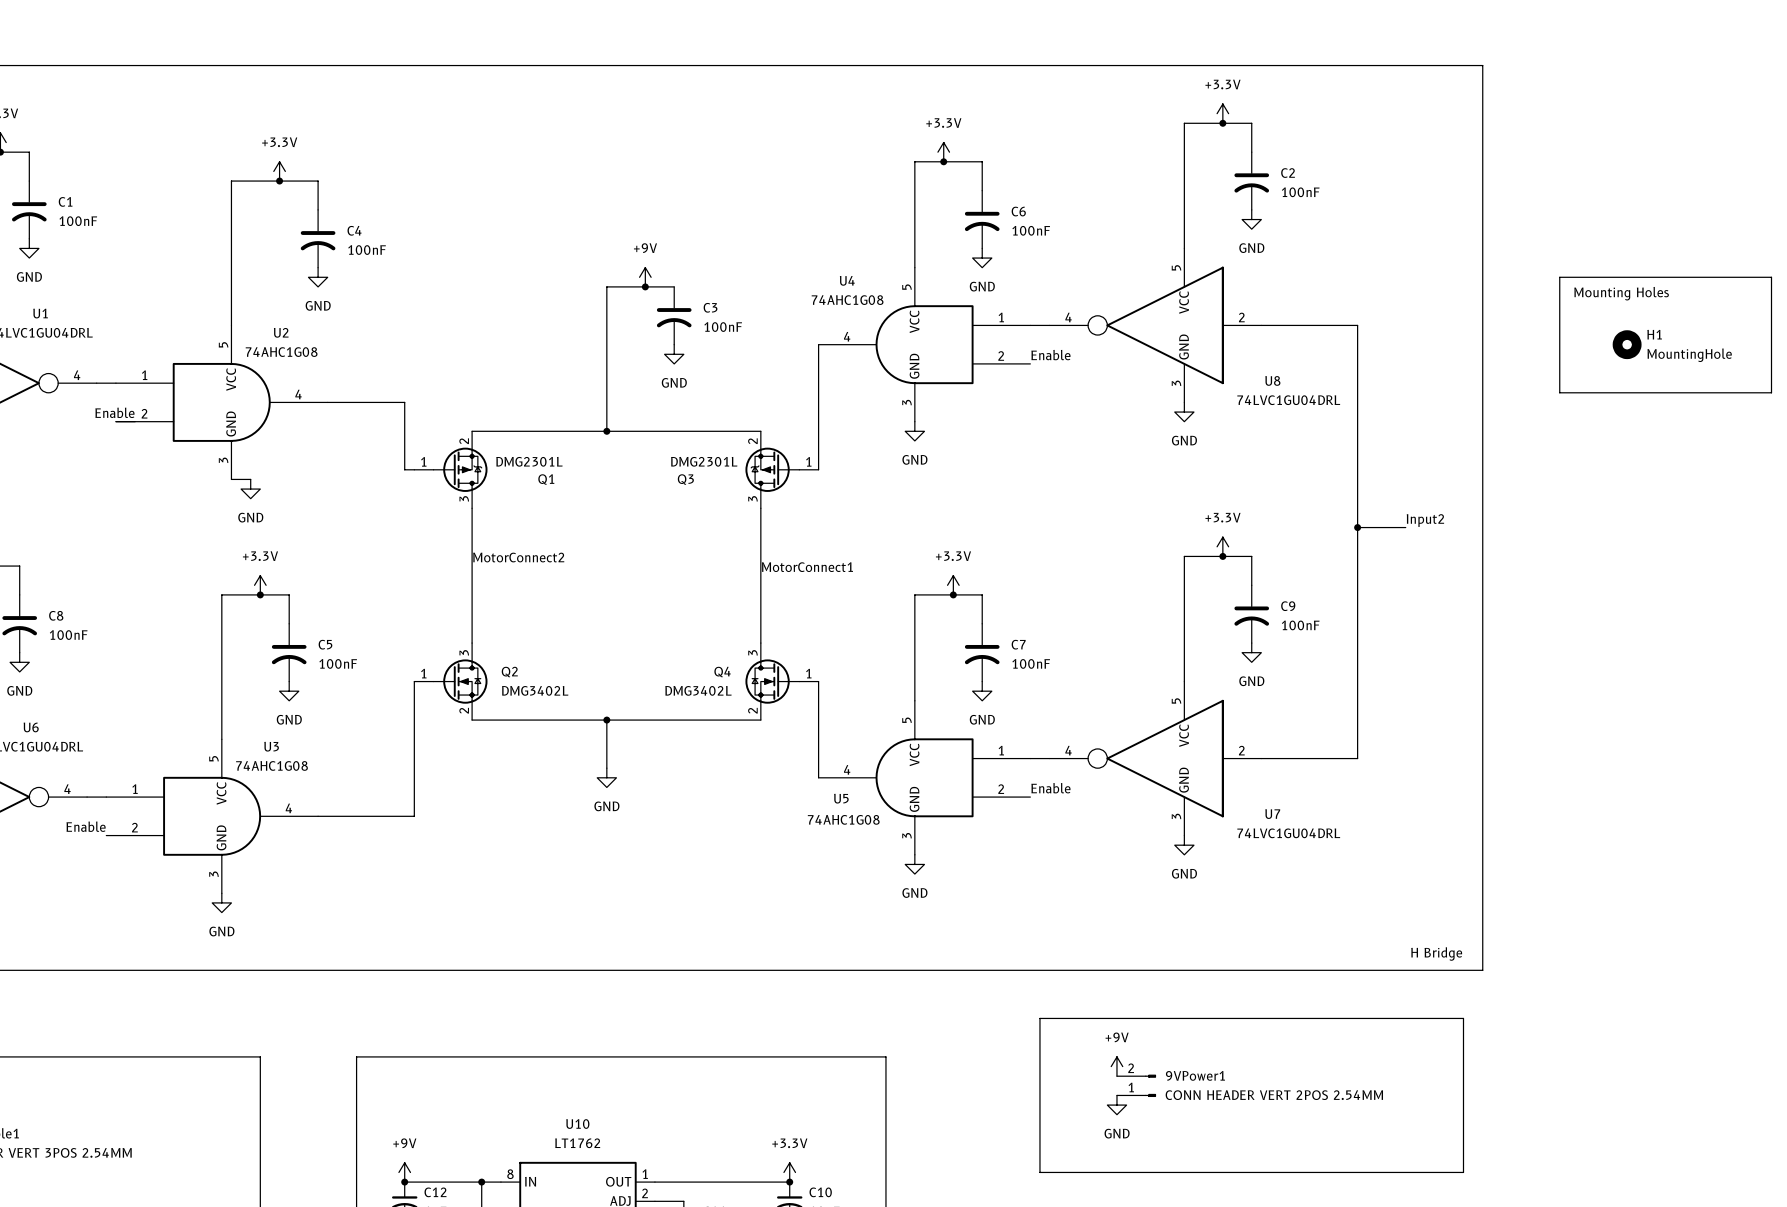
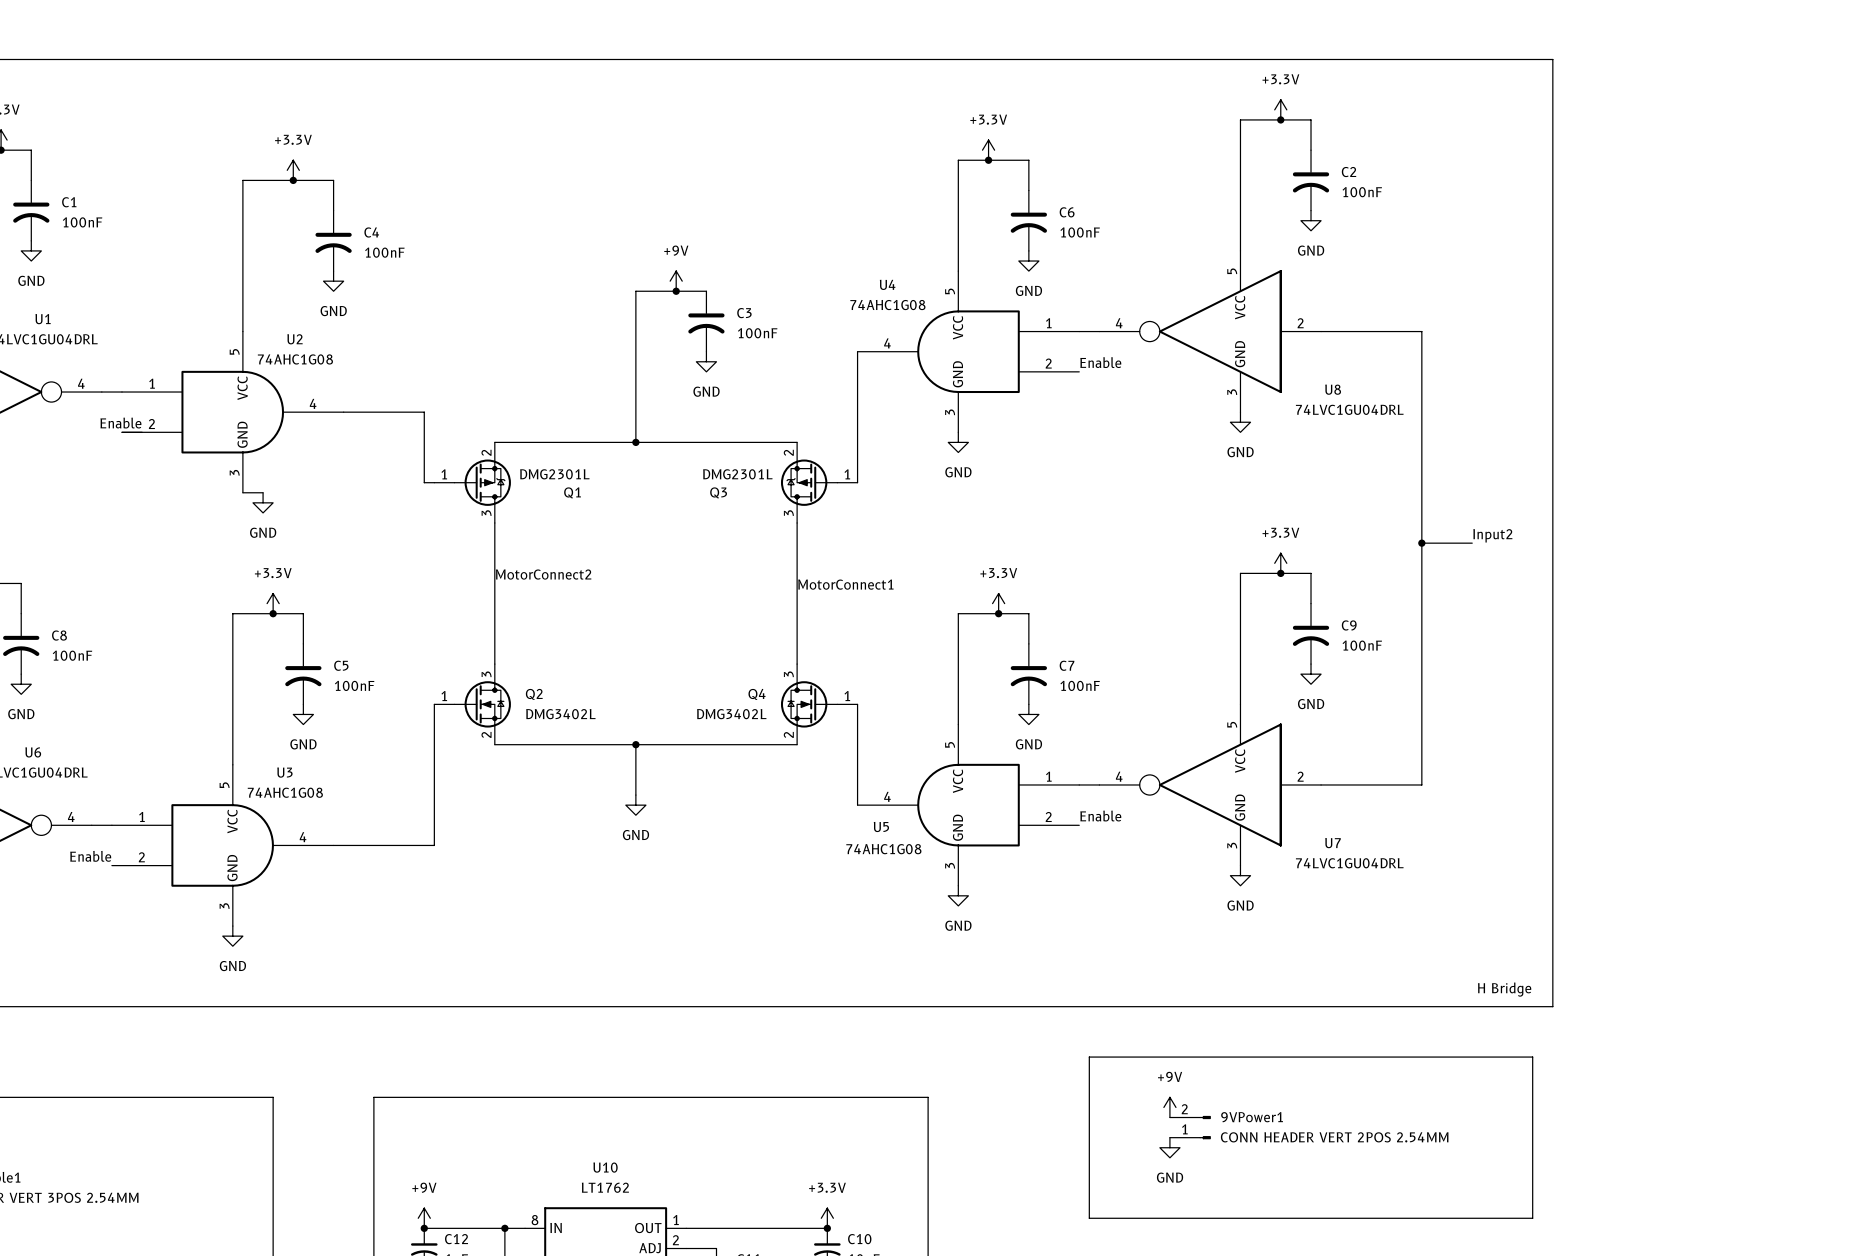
line: (1559, 277) (1771, 277) (1771, 392) (1559, 392) (1559, 277) -> none
text: Mounting Holes (1621, 293) -> none
H1: MountingHole (1627, 344) -> none

